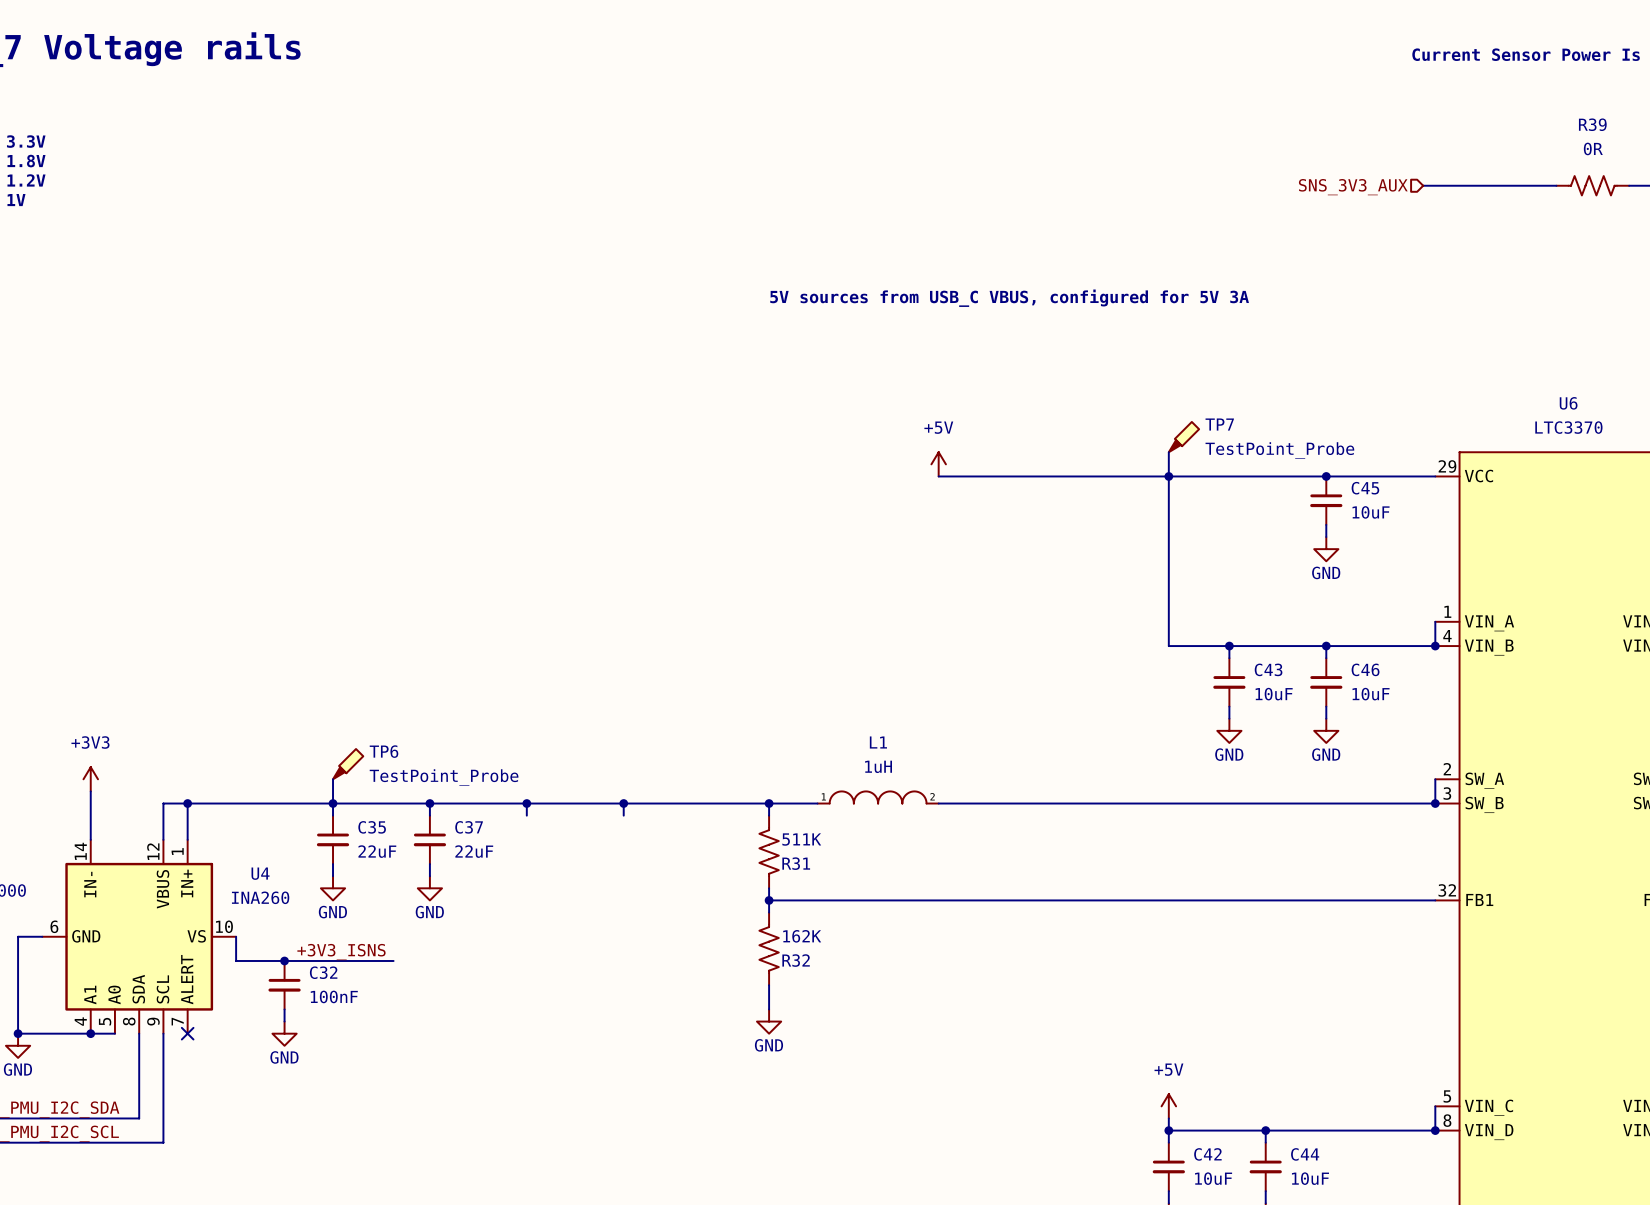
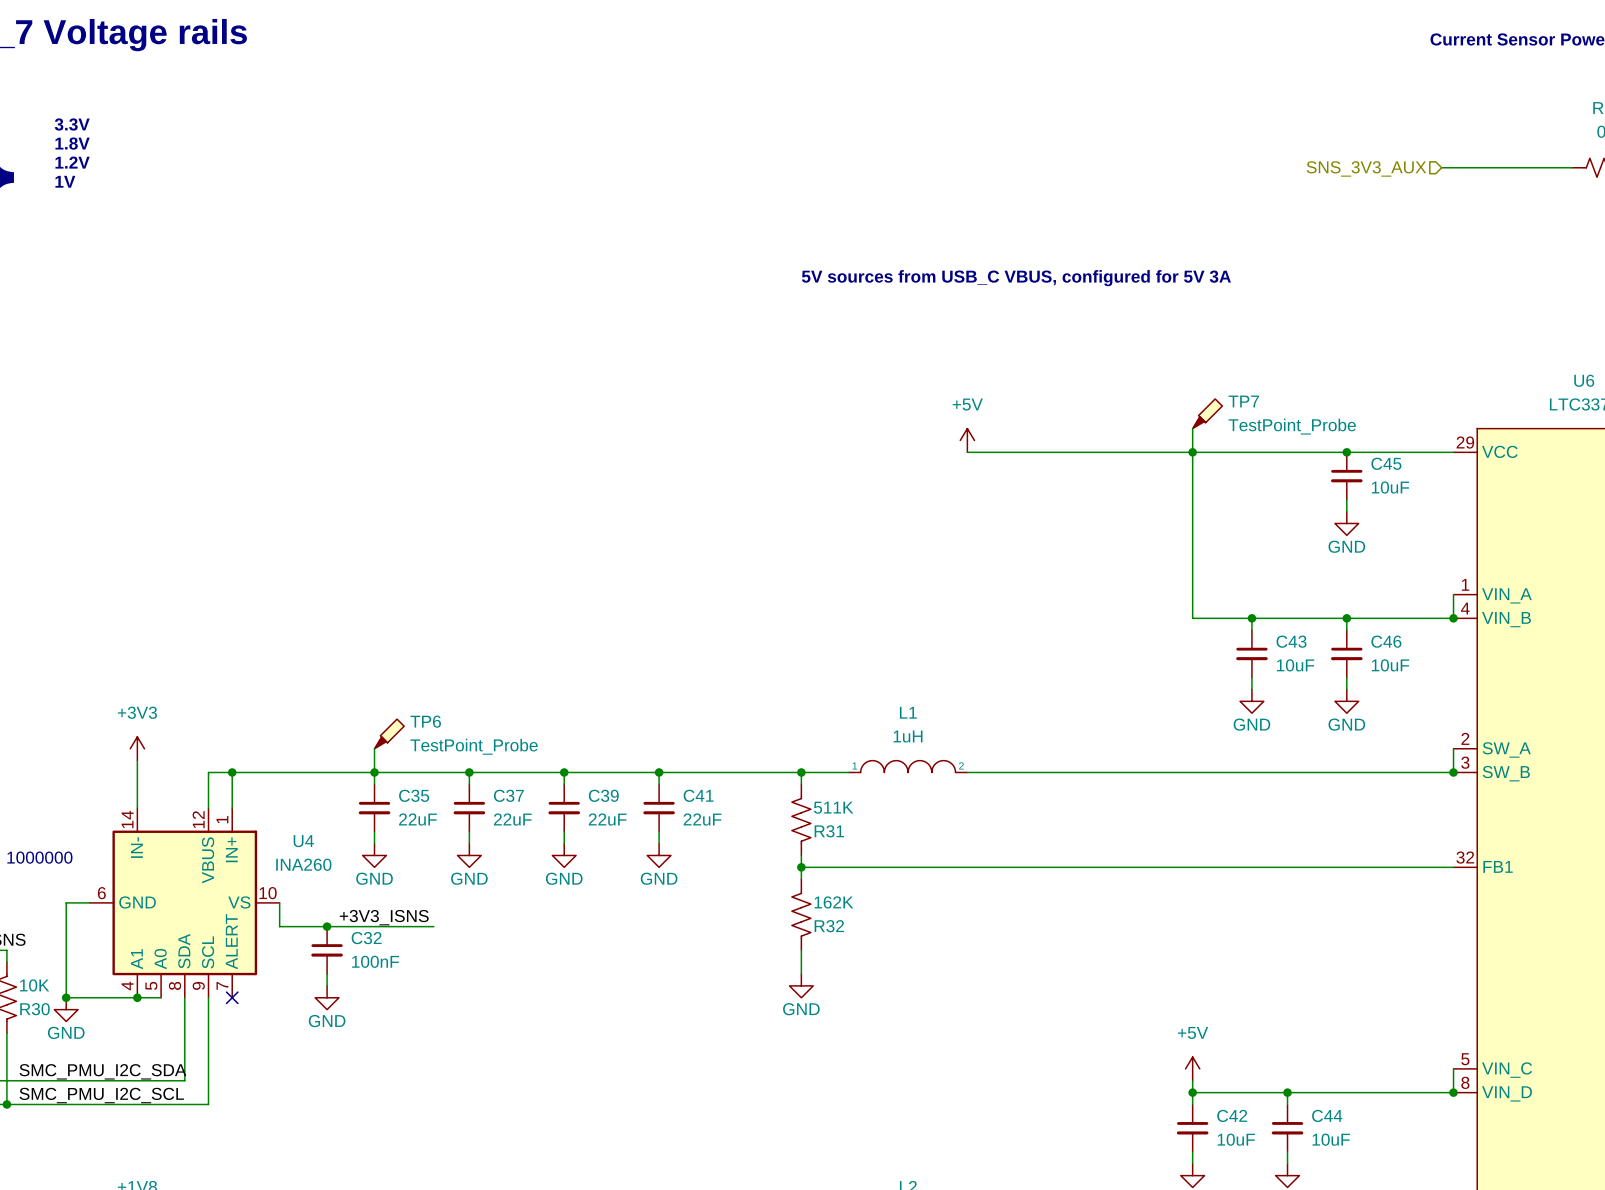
C39: none -> 22uF (564, 808)
C41: none -> 22uF (659, 808)
wire: none -> (564, 831) (564, 843)
wire: none -> (659, 831) (659, 843)
power symbol: none -> GND (564, 855)
power symbol: none -> GND (659, 855)

